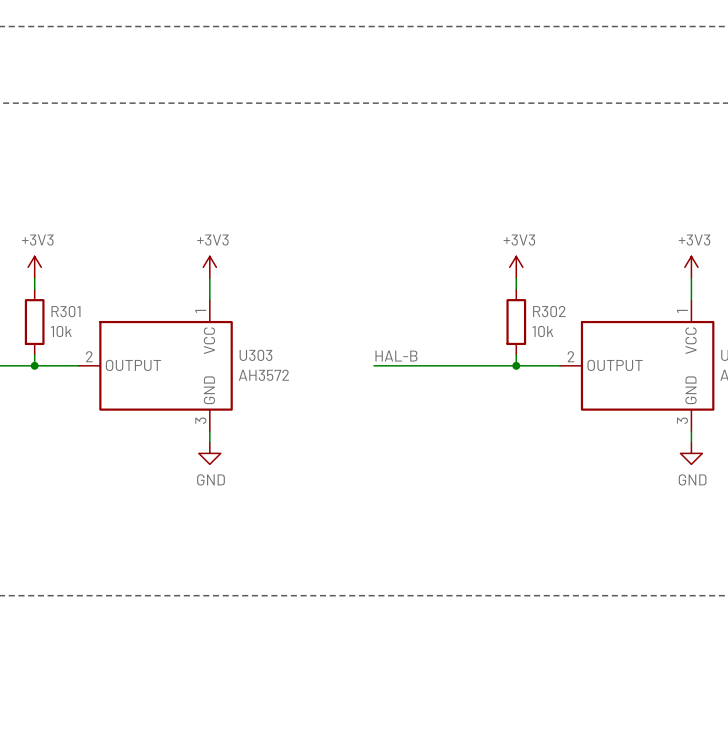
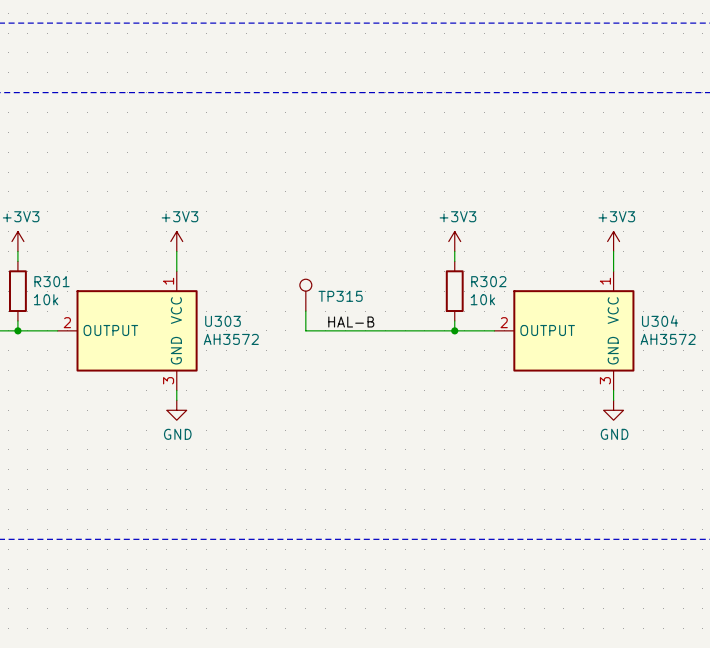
TP315: none -> (305, 295)
wire: none -> (305, 311) (305, 330) (325, 330)

